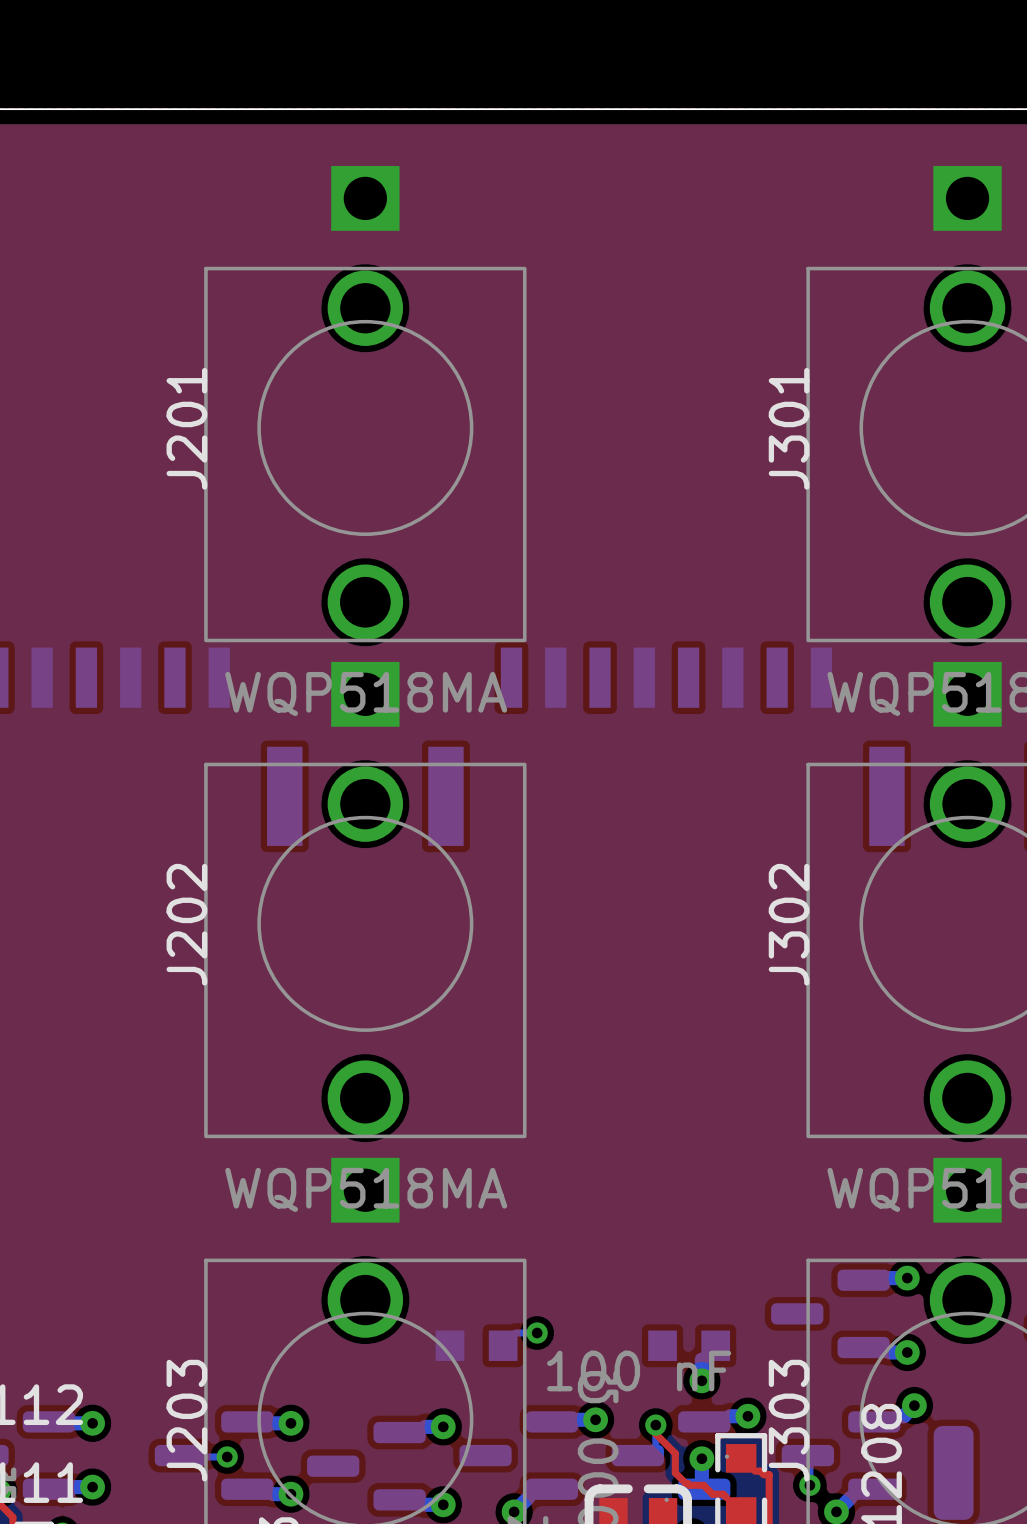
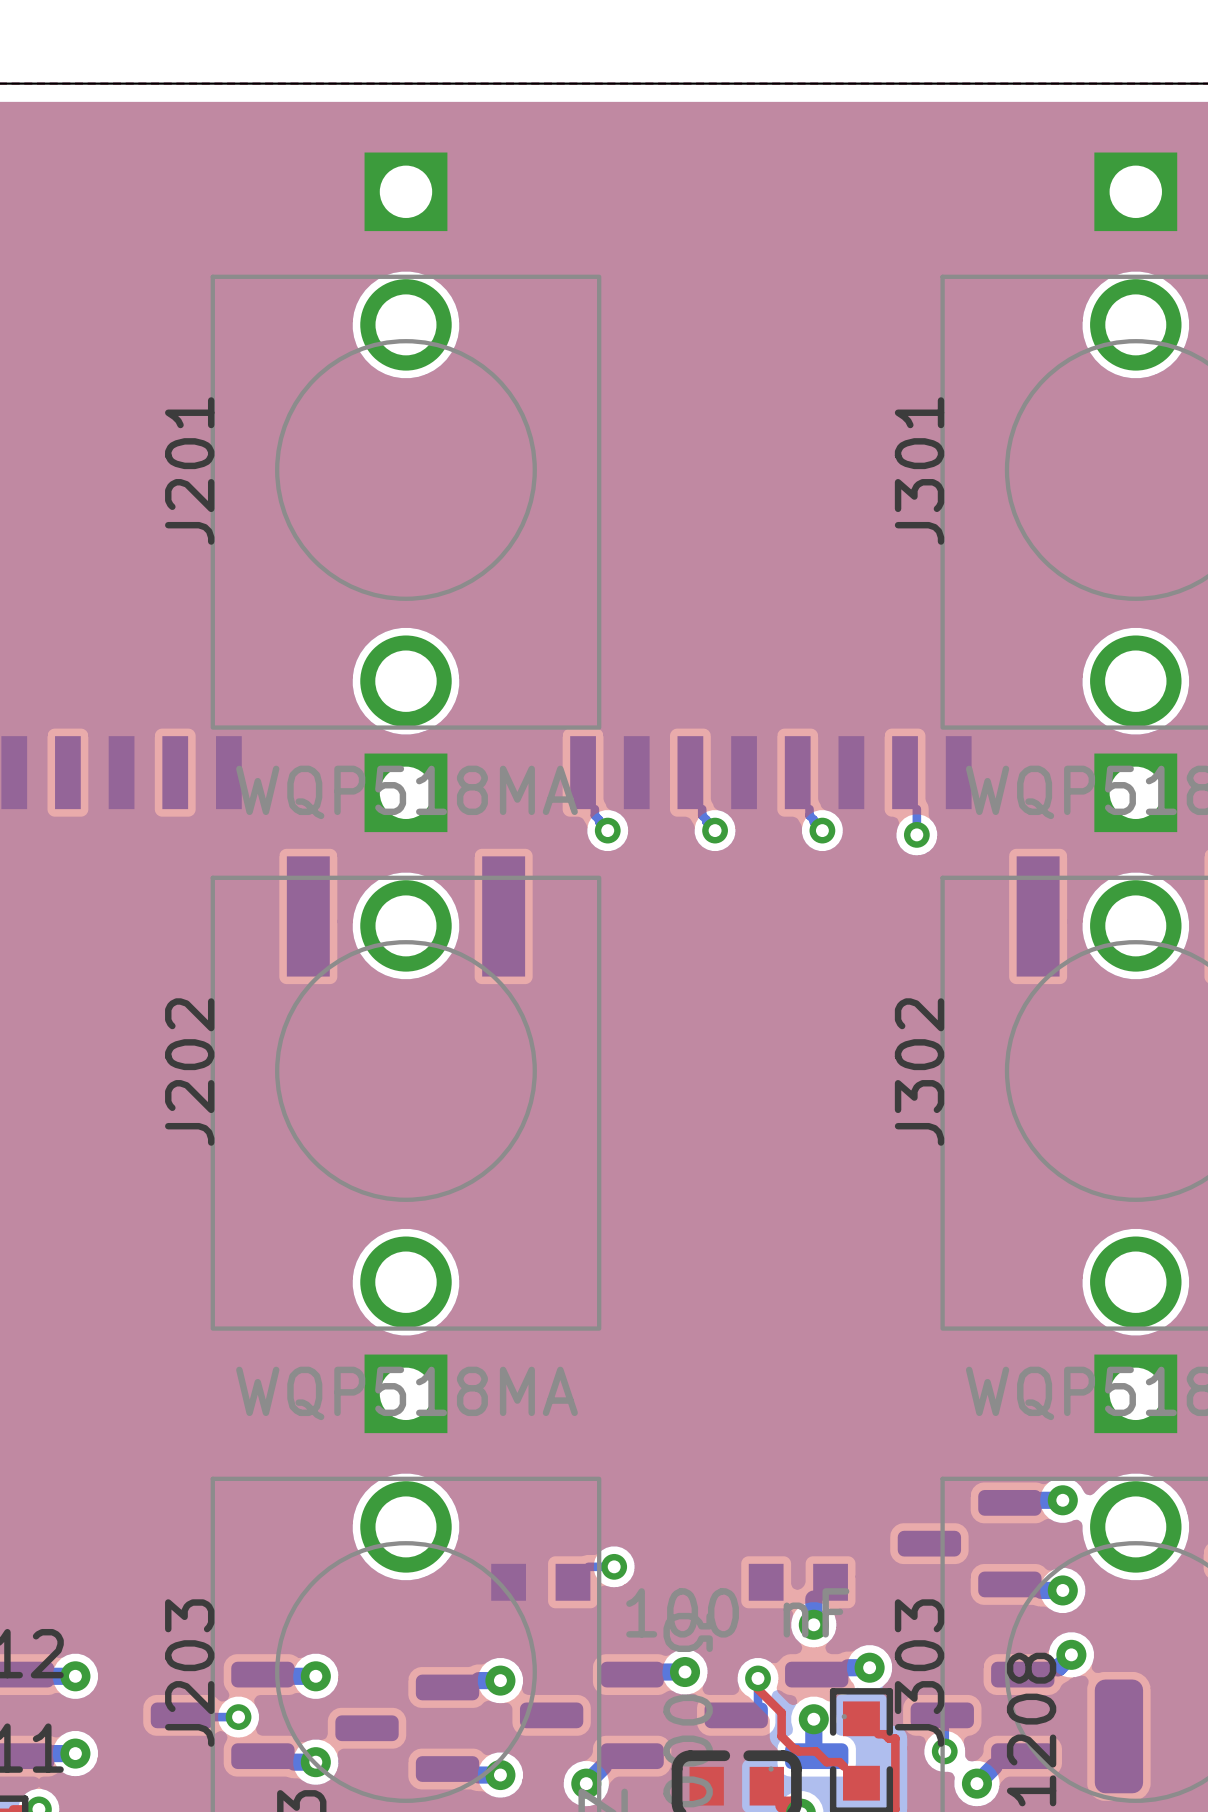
bottom track: none -> (594, 809) (594, 815) (607, 830)
bottom track: none -> (702, 809) (702, 815) (715, 830)
bottom track: none -> (809, 809) (809, 815) (822, 830)
bottom track: none -> (916, 809) (916, 834)
via: none -> (607, 830)
via: none -> (715, 830)
via: none -> (822, 830)
via: none -> (916, 834)

